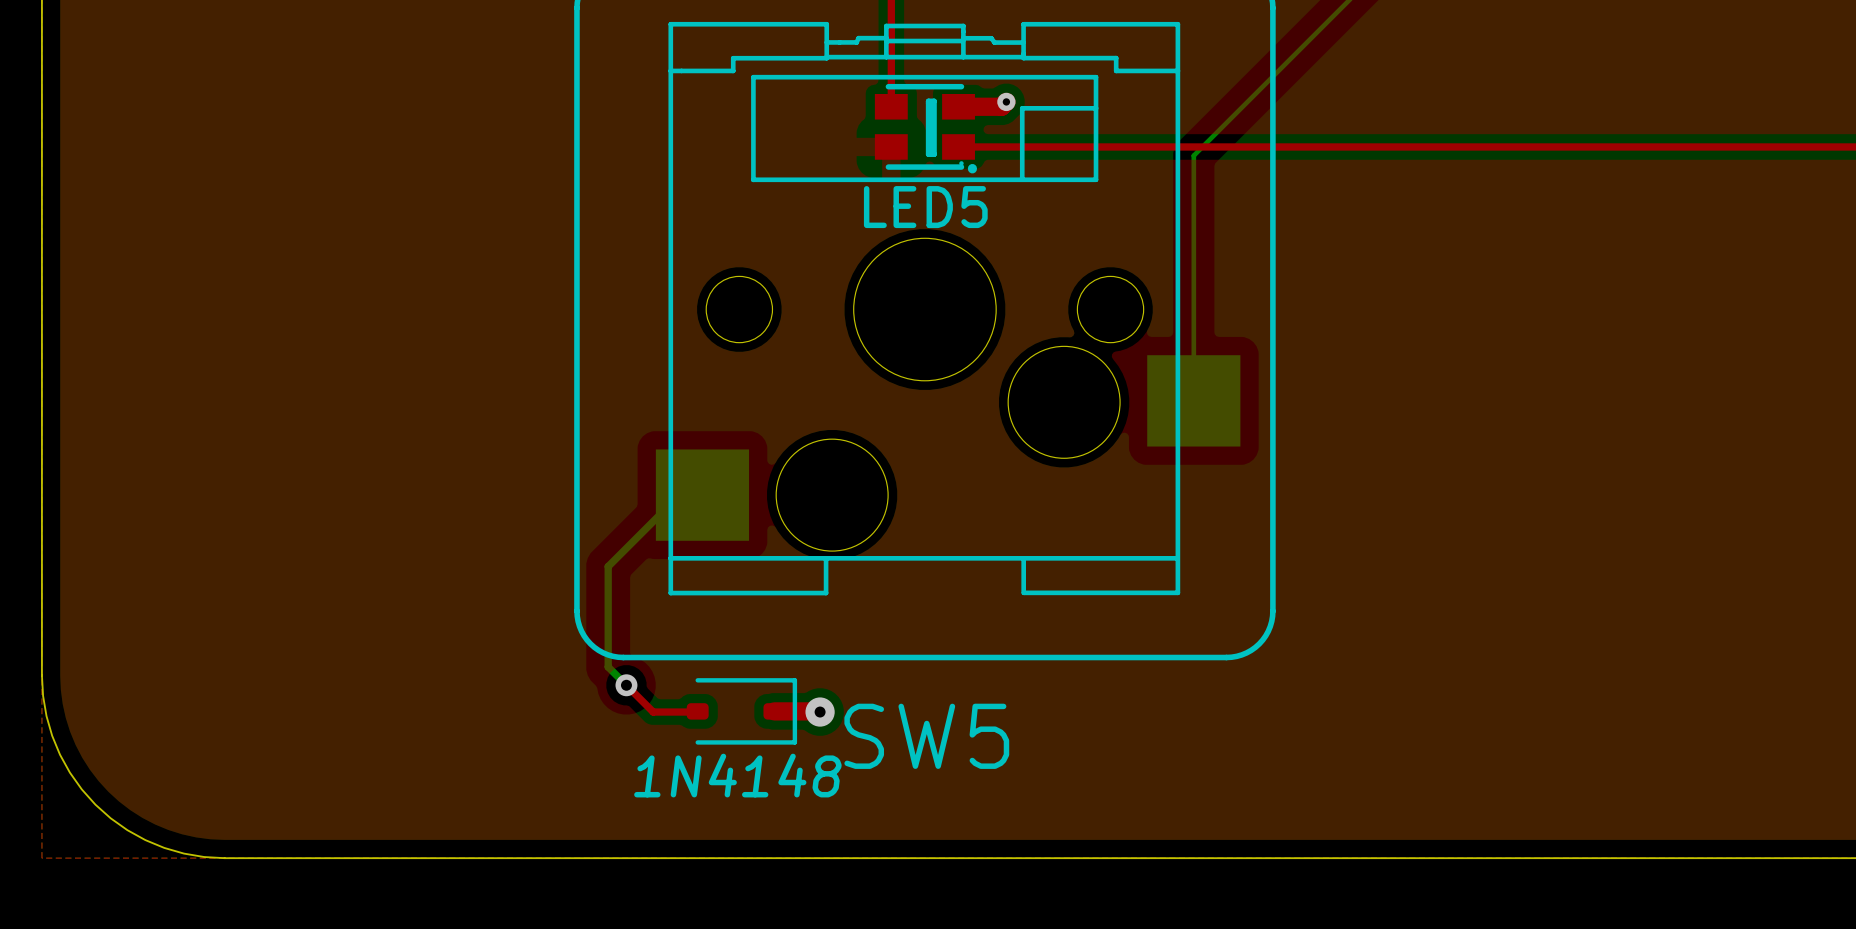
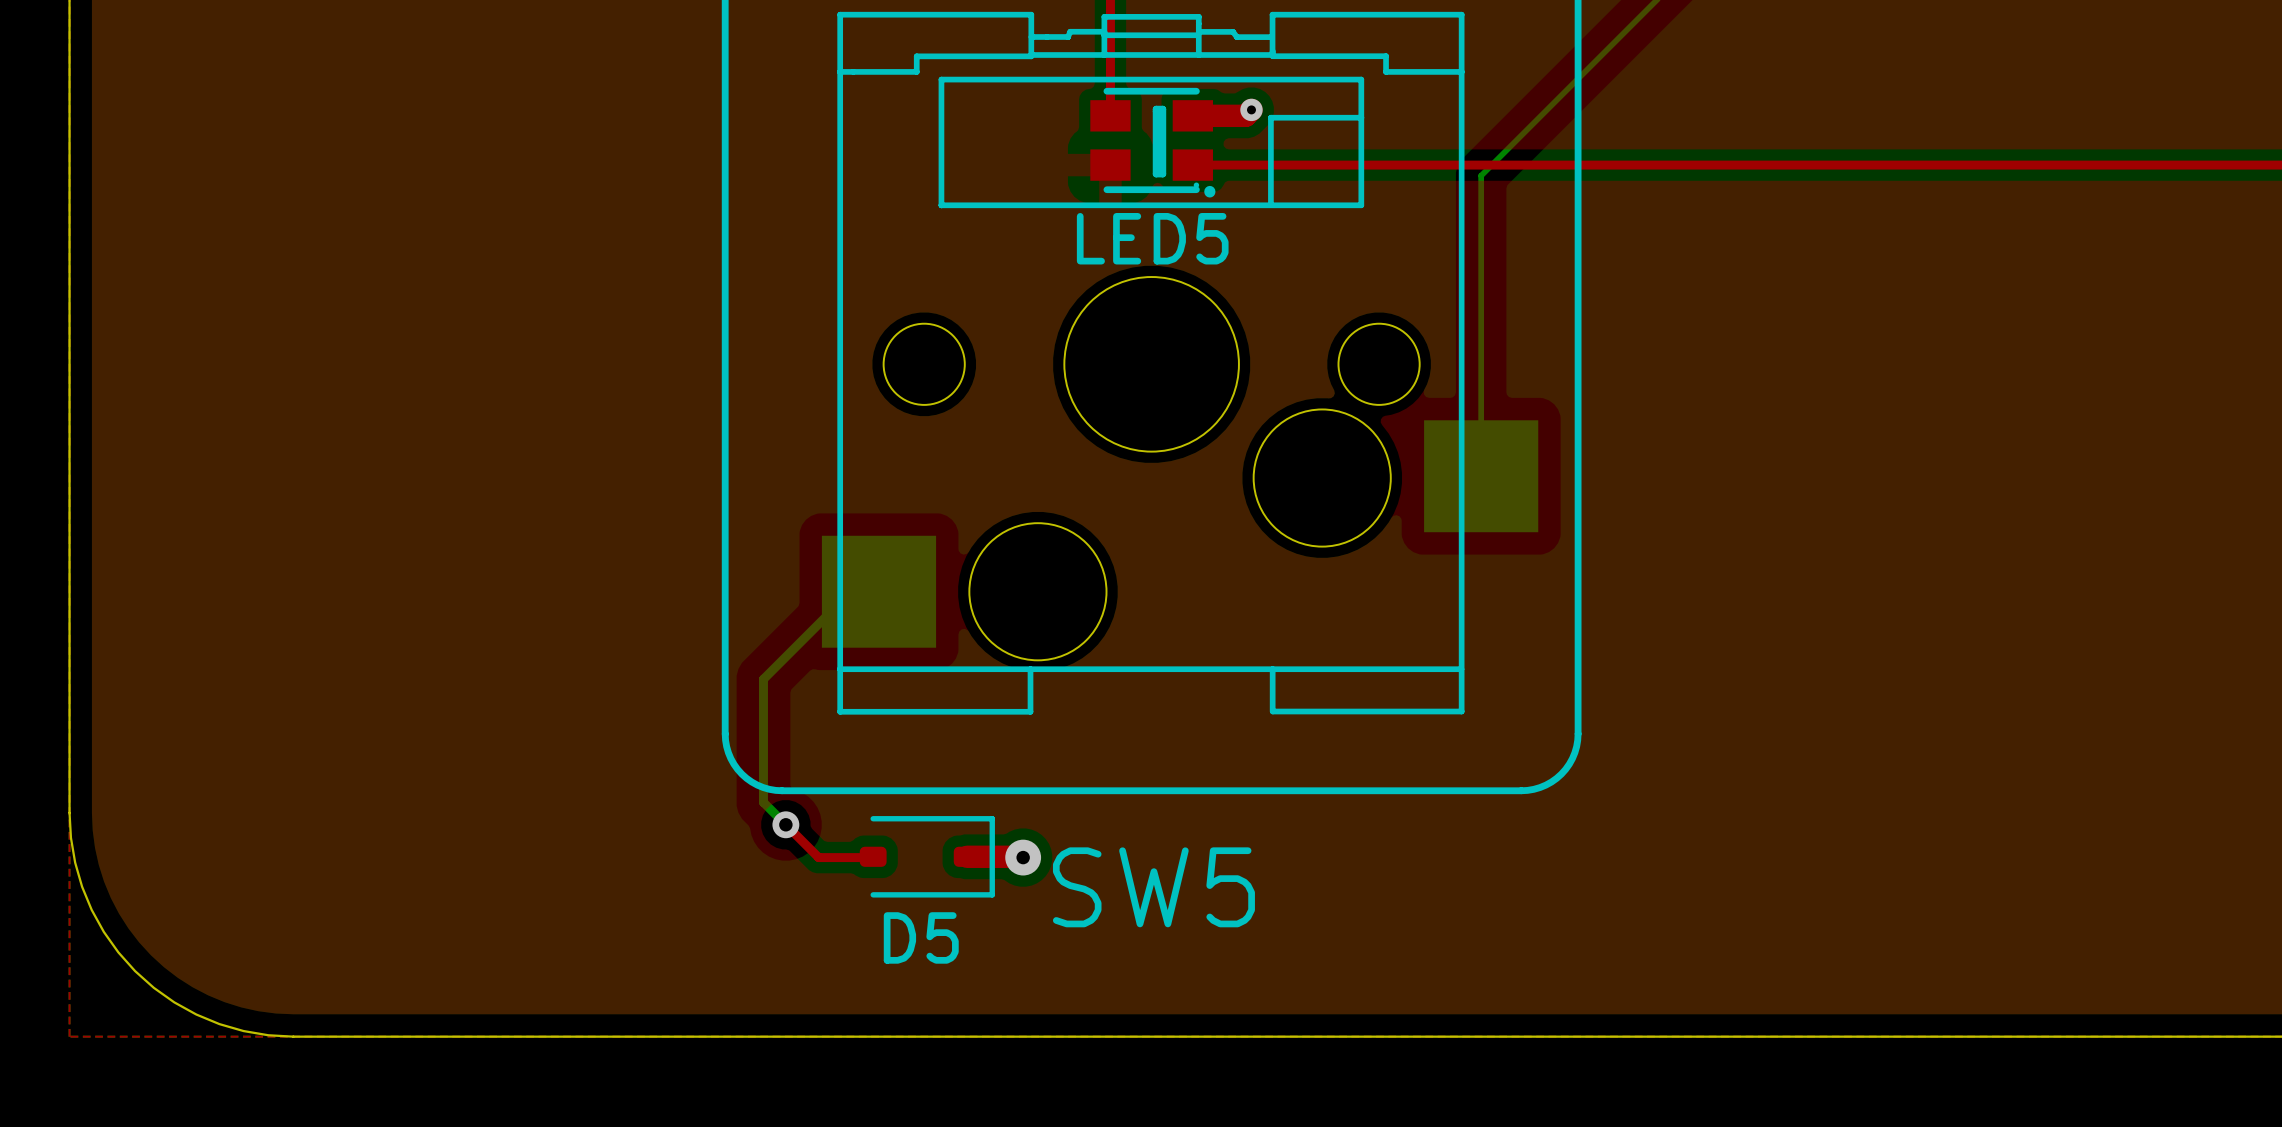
D5 value: 1N4148 (737, 775) -> none
D5 name: none -> D5 (921, 937)

